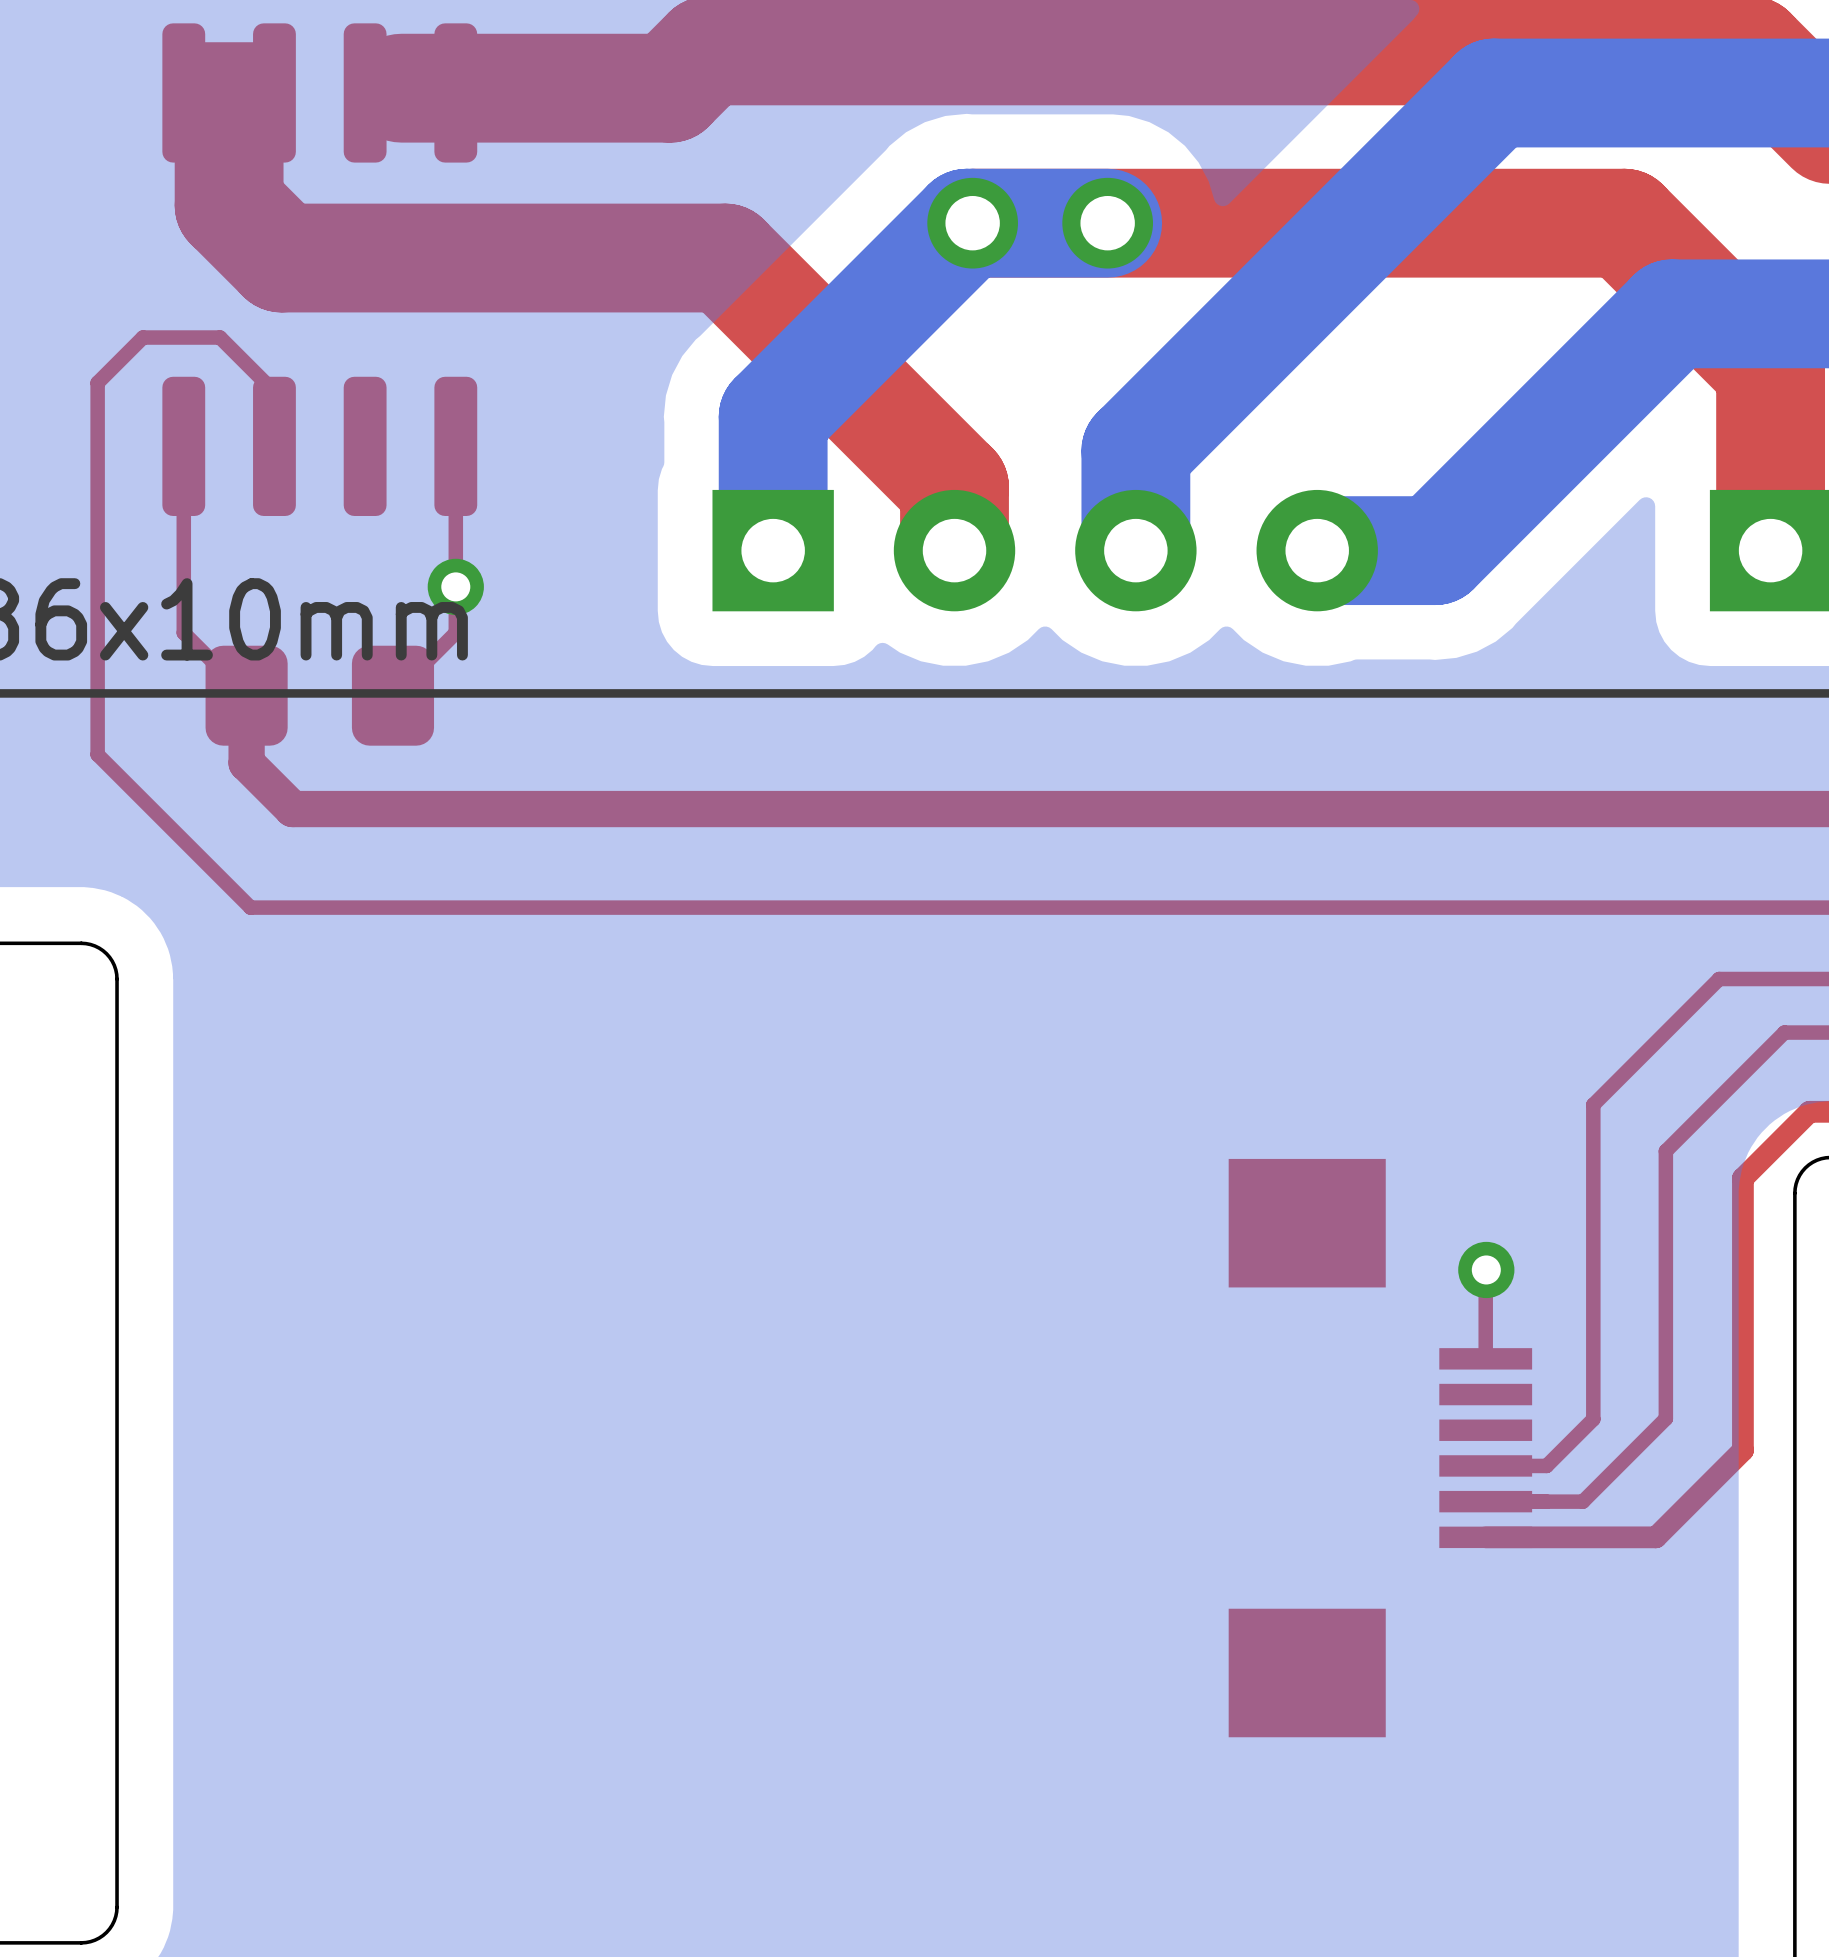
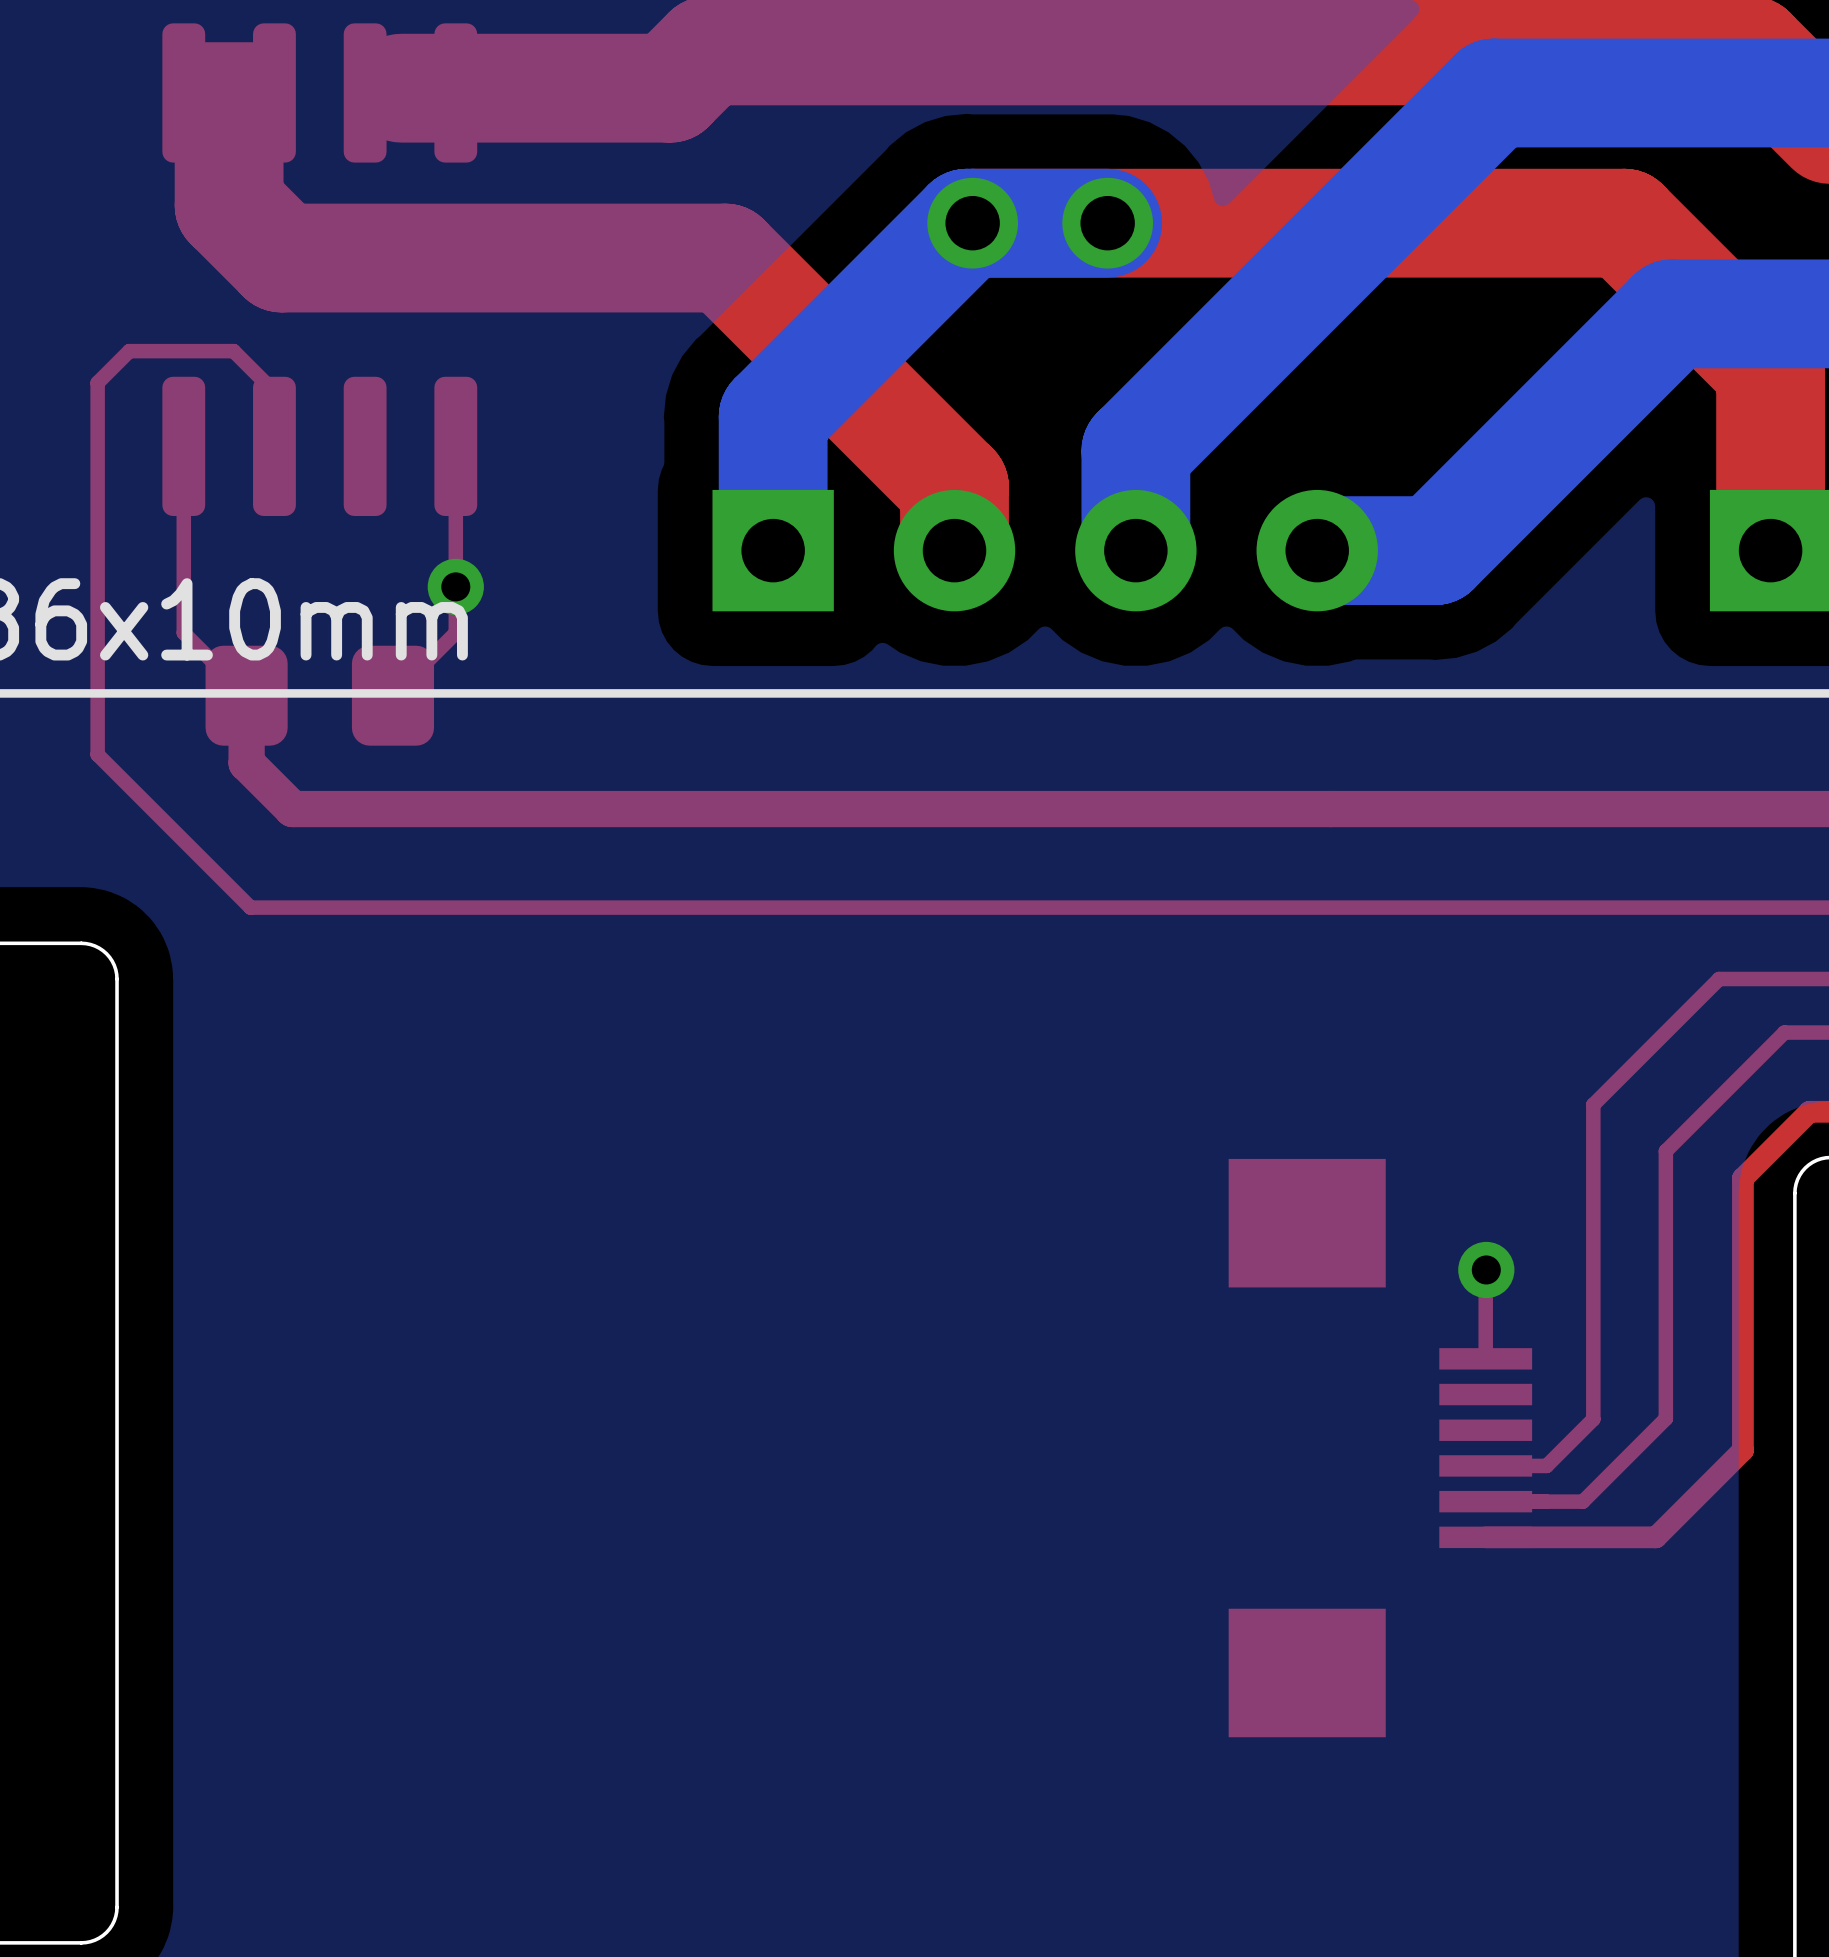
top track: (233, 351) (220, 337) (142, 337) (129, 351) -> (233, 351) (129, 351)

